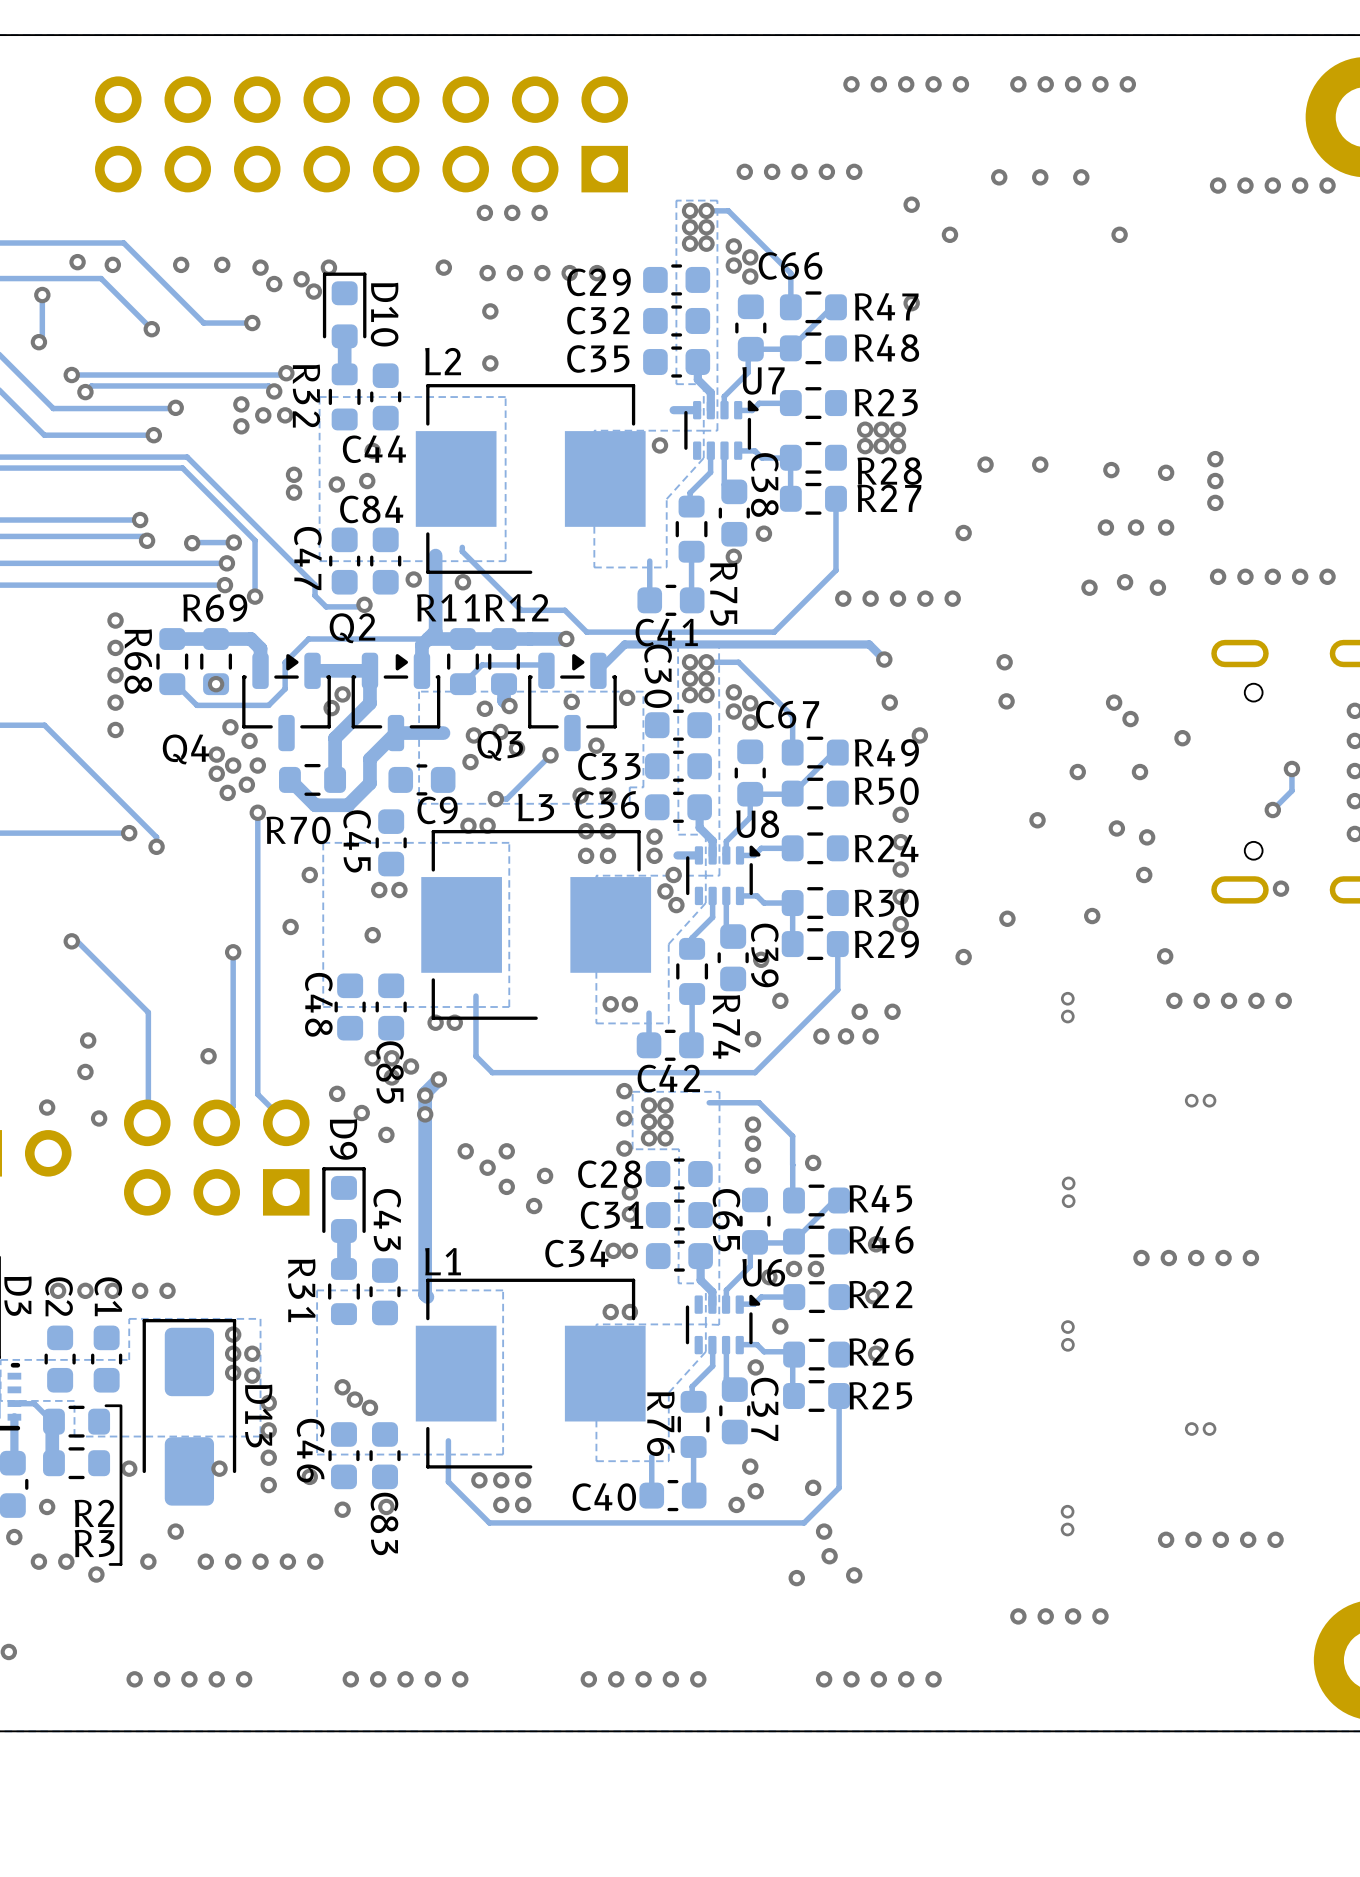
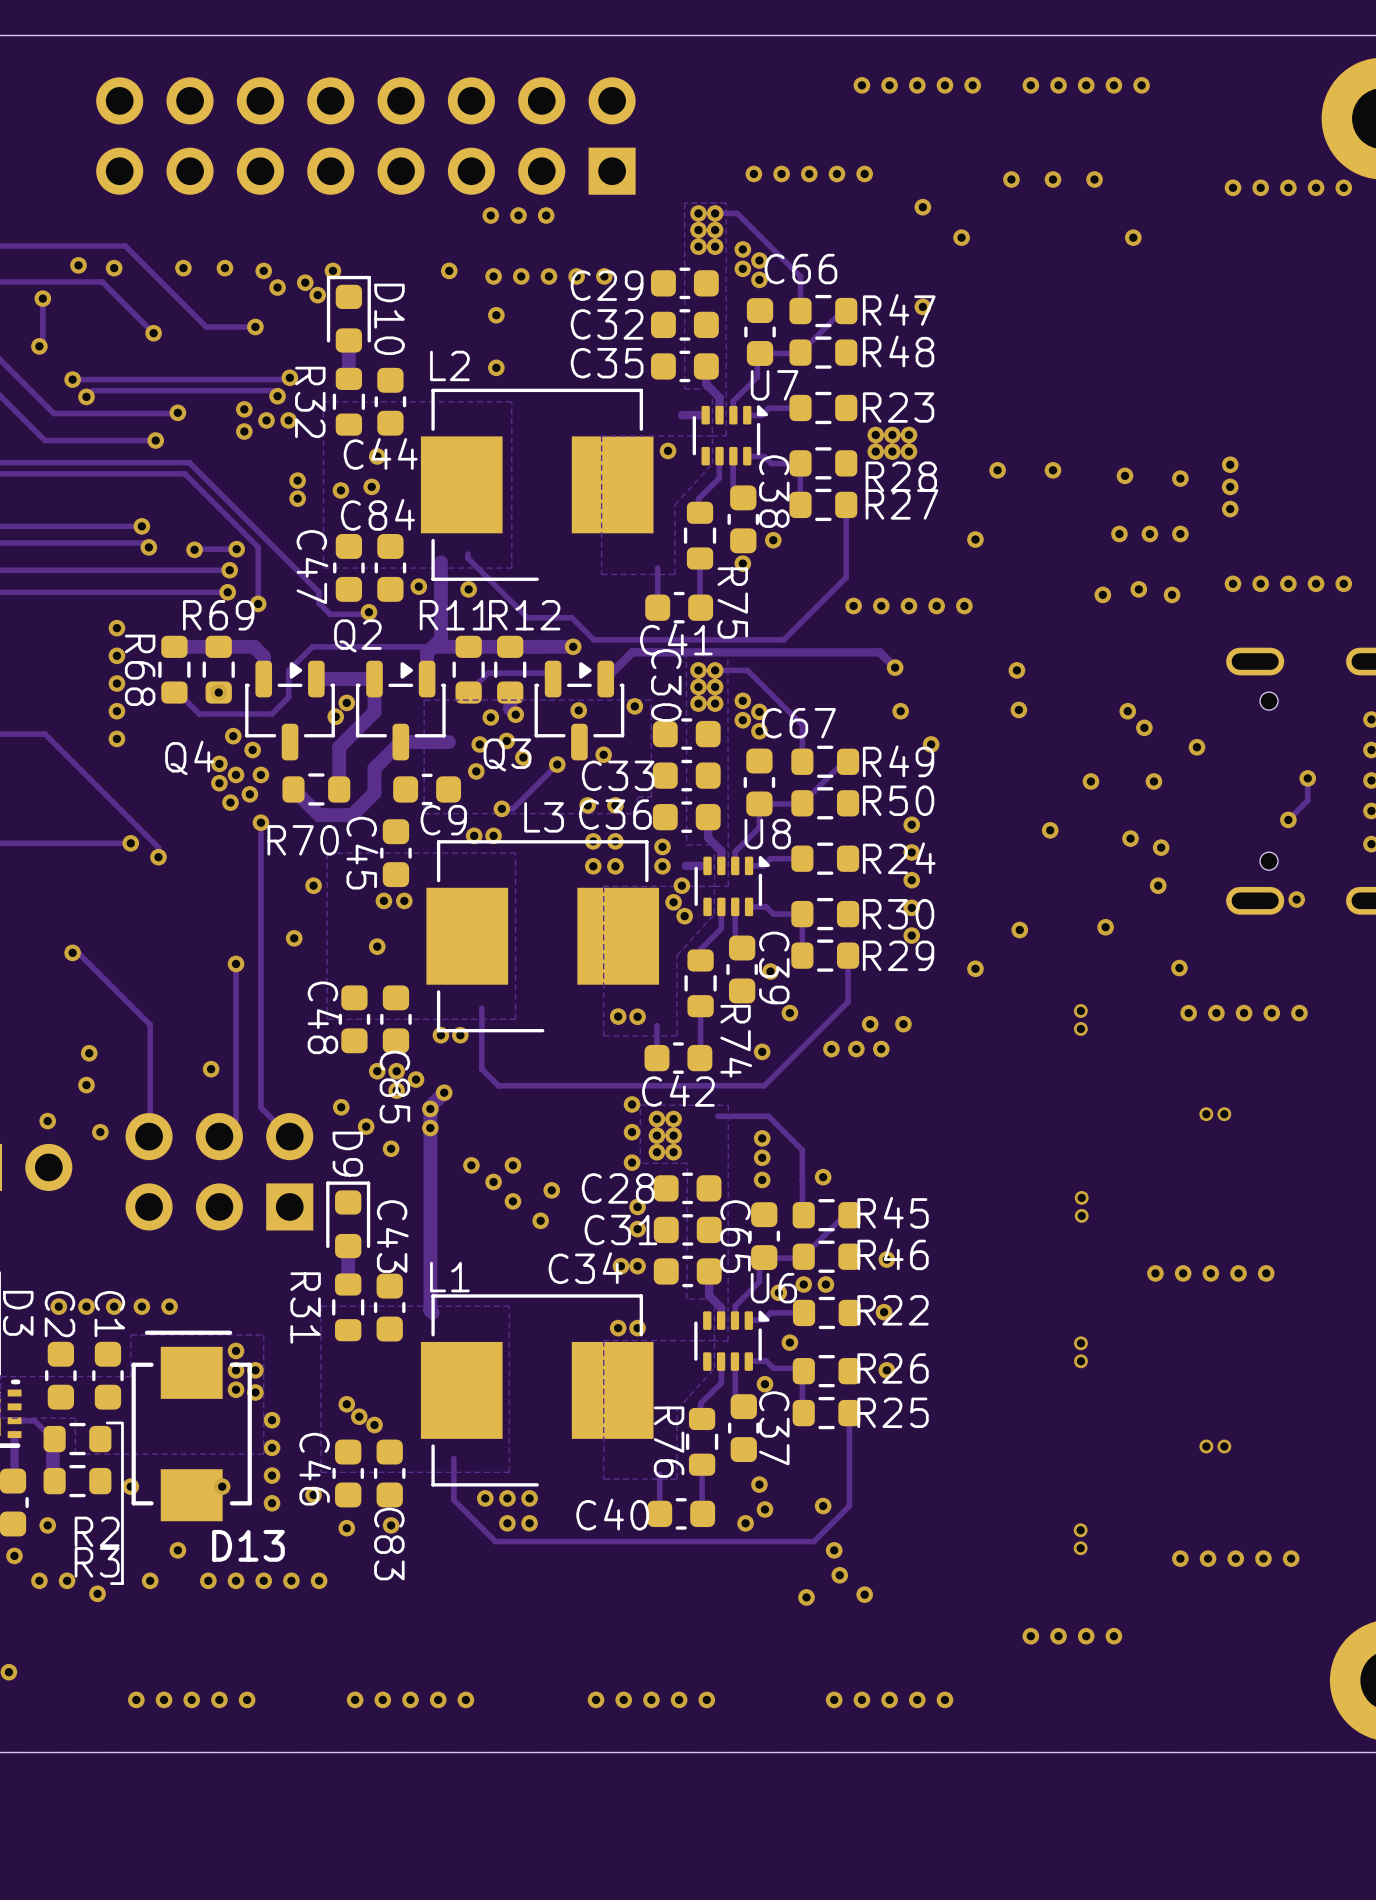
D13 footprint: [142, 1319, 237, 1506] -> [131, 1330, 252, 1522]
D13 name rotation: 0° (258, 1416) -> 90° counterclockwise (248, 1545)
D13 name position: D13 (258, 1416) -> D13 (248, 1545)

